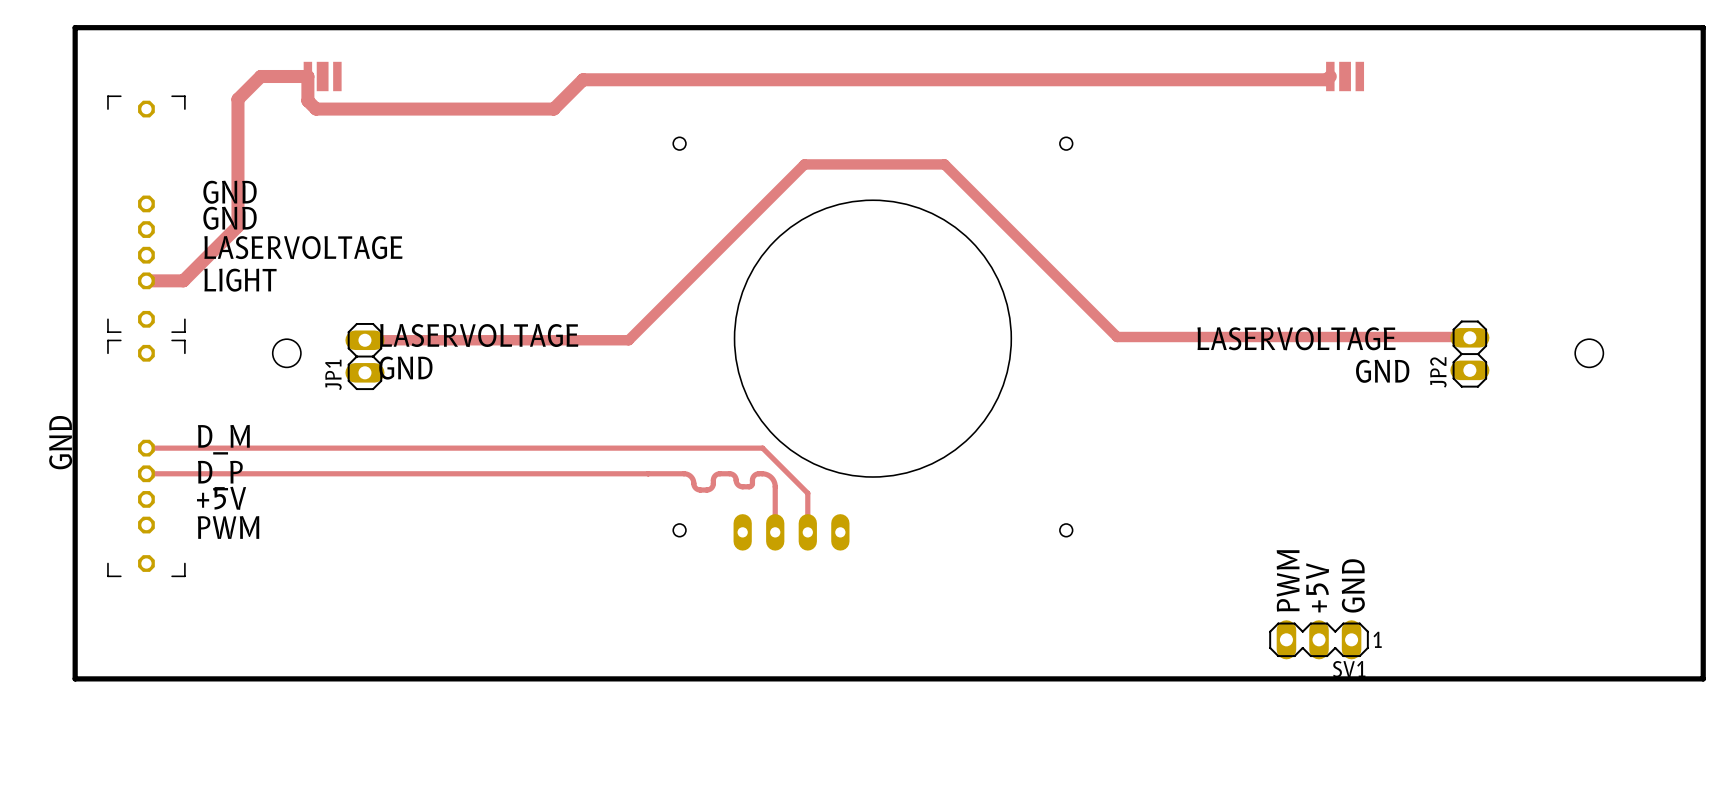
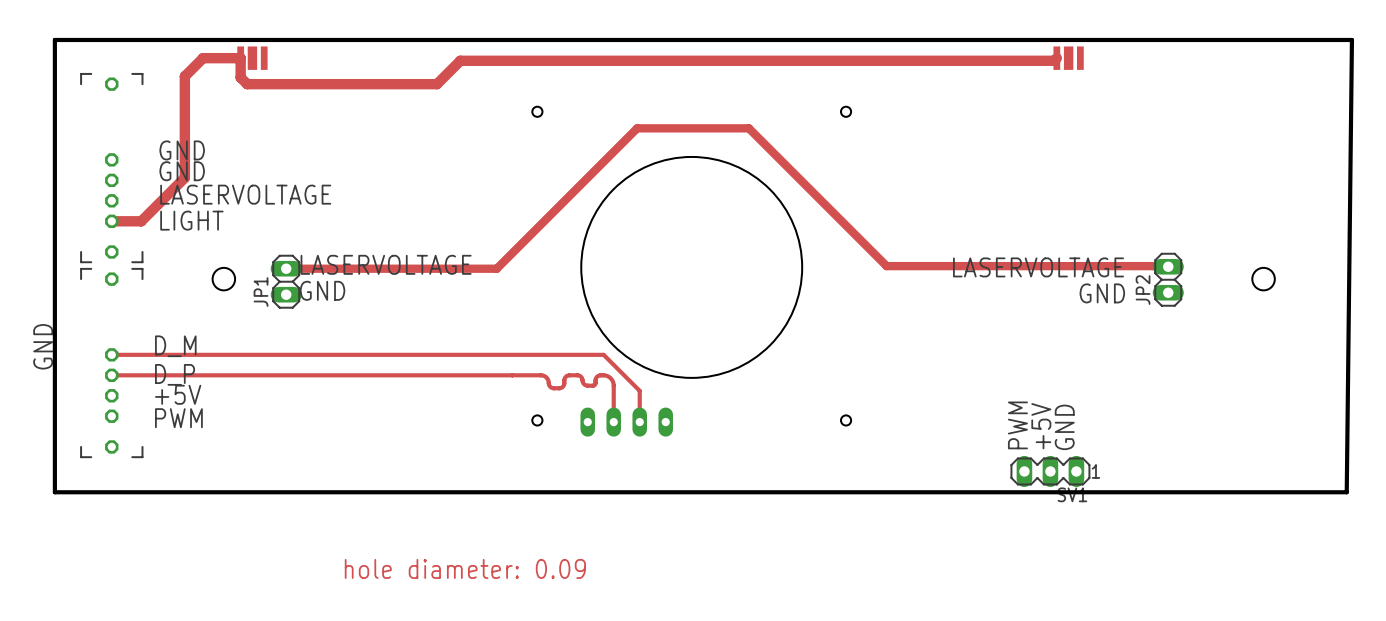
board edge: (75, 53) (75, 27) (1703, 27) (1703, 678) (75, 678) (75, 620) -> (54, 39) (1351, 39) (1346, 492) (54, 492)
text position: PWM (1288, 580) -> PWM (1017, 425)
text position: GND (1353, 585) -> GND (1064, 427)
text position: +5V (1317, 587) -> +5V (1041, 426)
SV1 position: (1319, 639) -> (1050, 471)
text: none -> hole diameter: 0.09 (465, 568)

